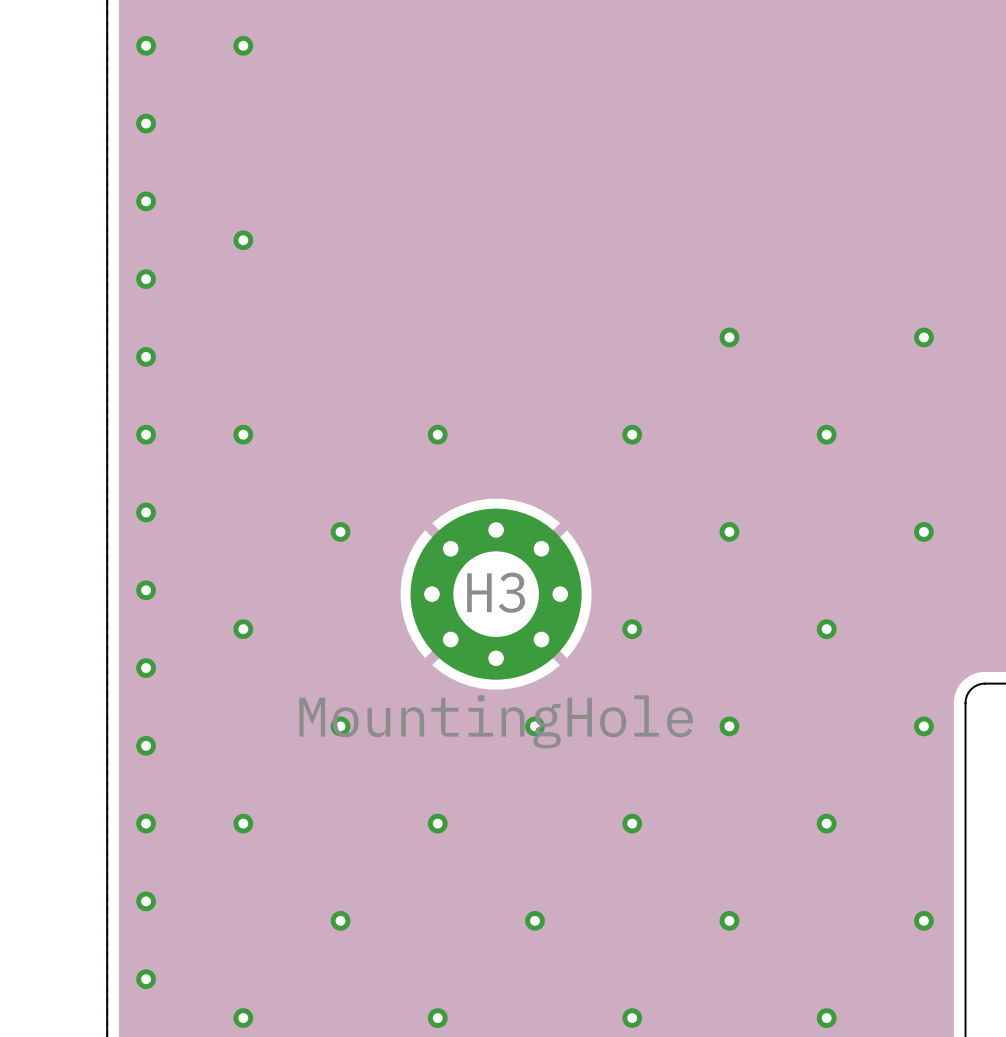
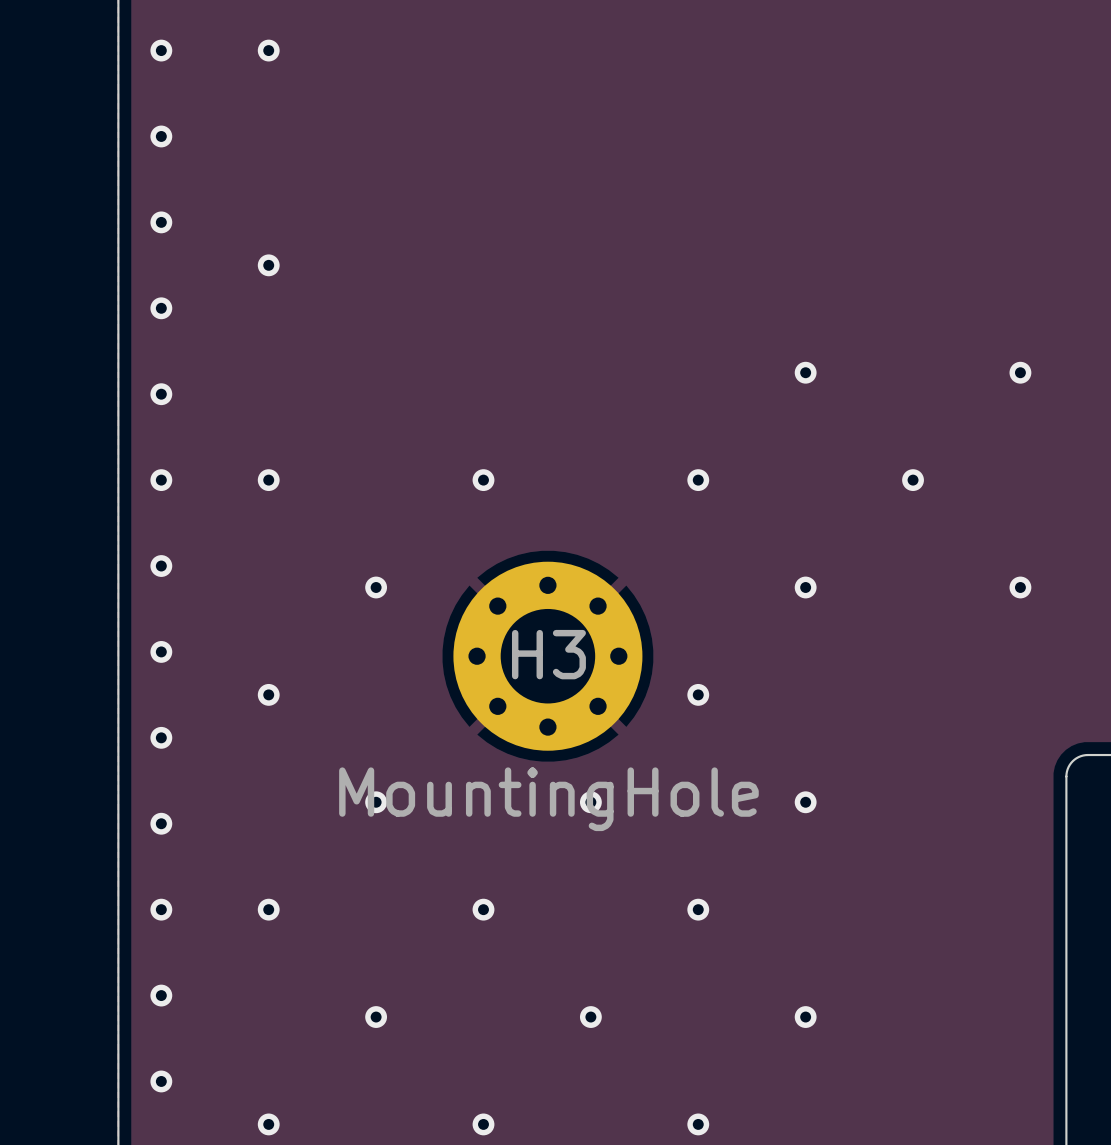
via: (826, 629) -> none
via: (923, 726) -> none
via: (826, 823) -> none
via: (923, 920) -> none
via: (826, 1018) -> none

